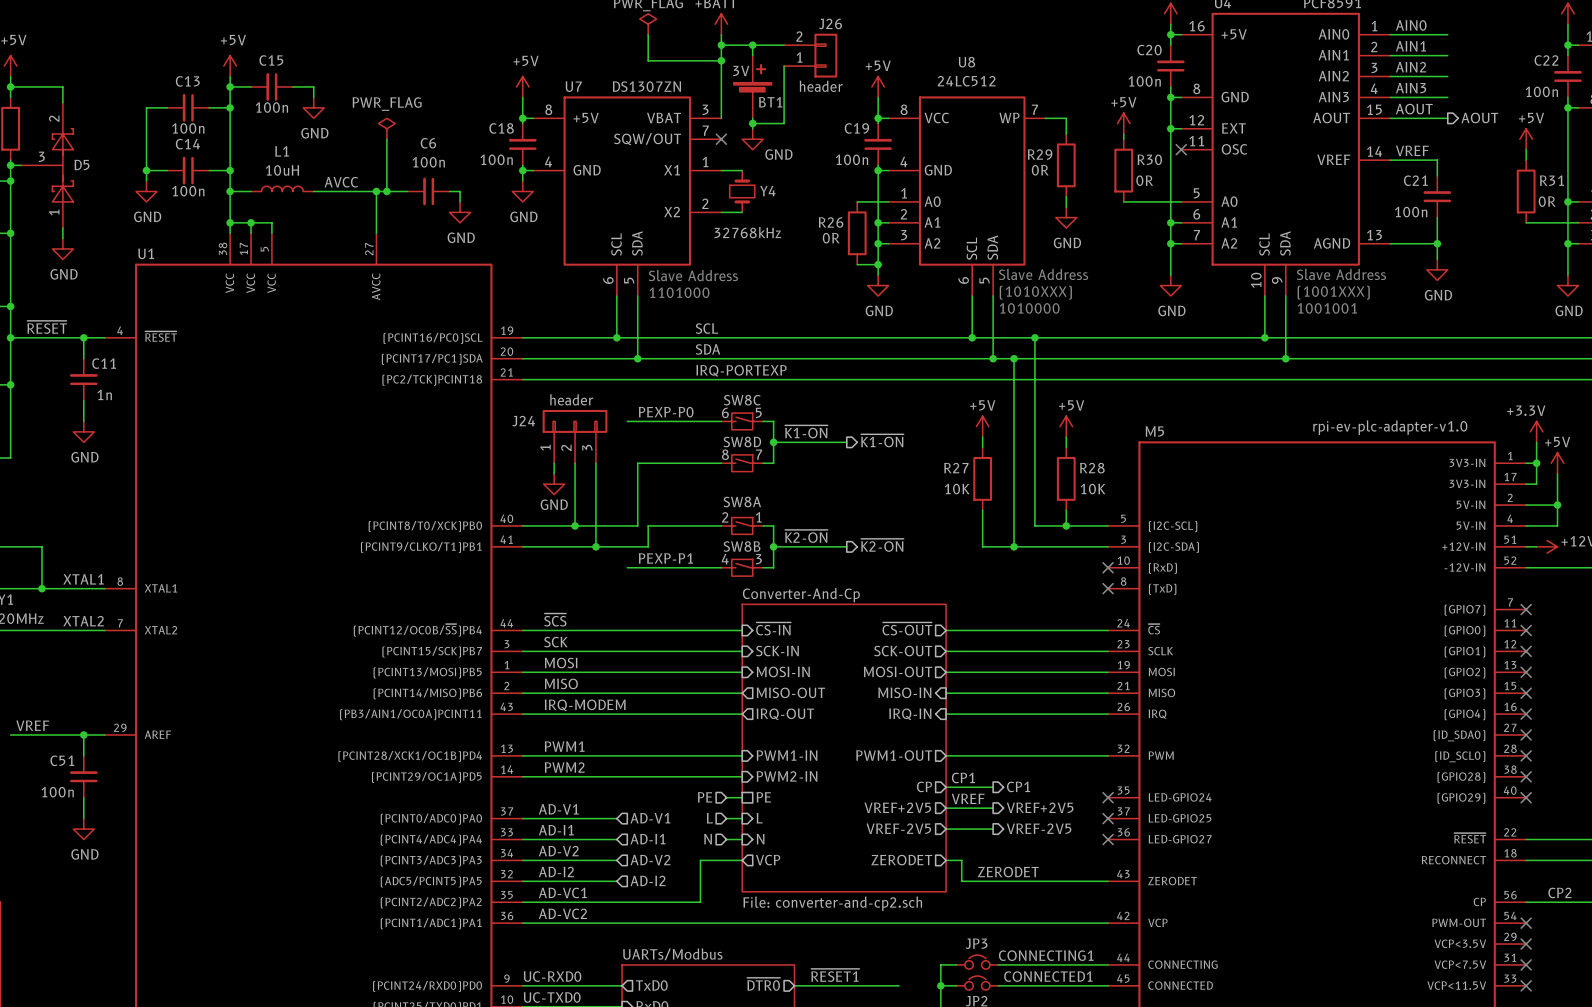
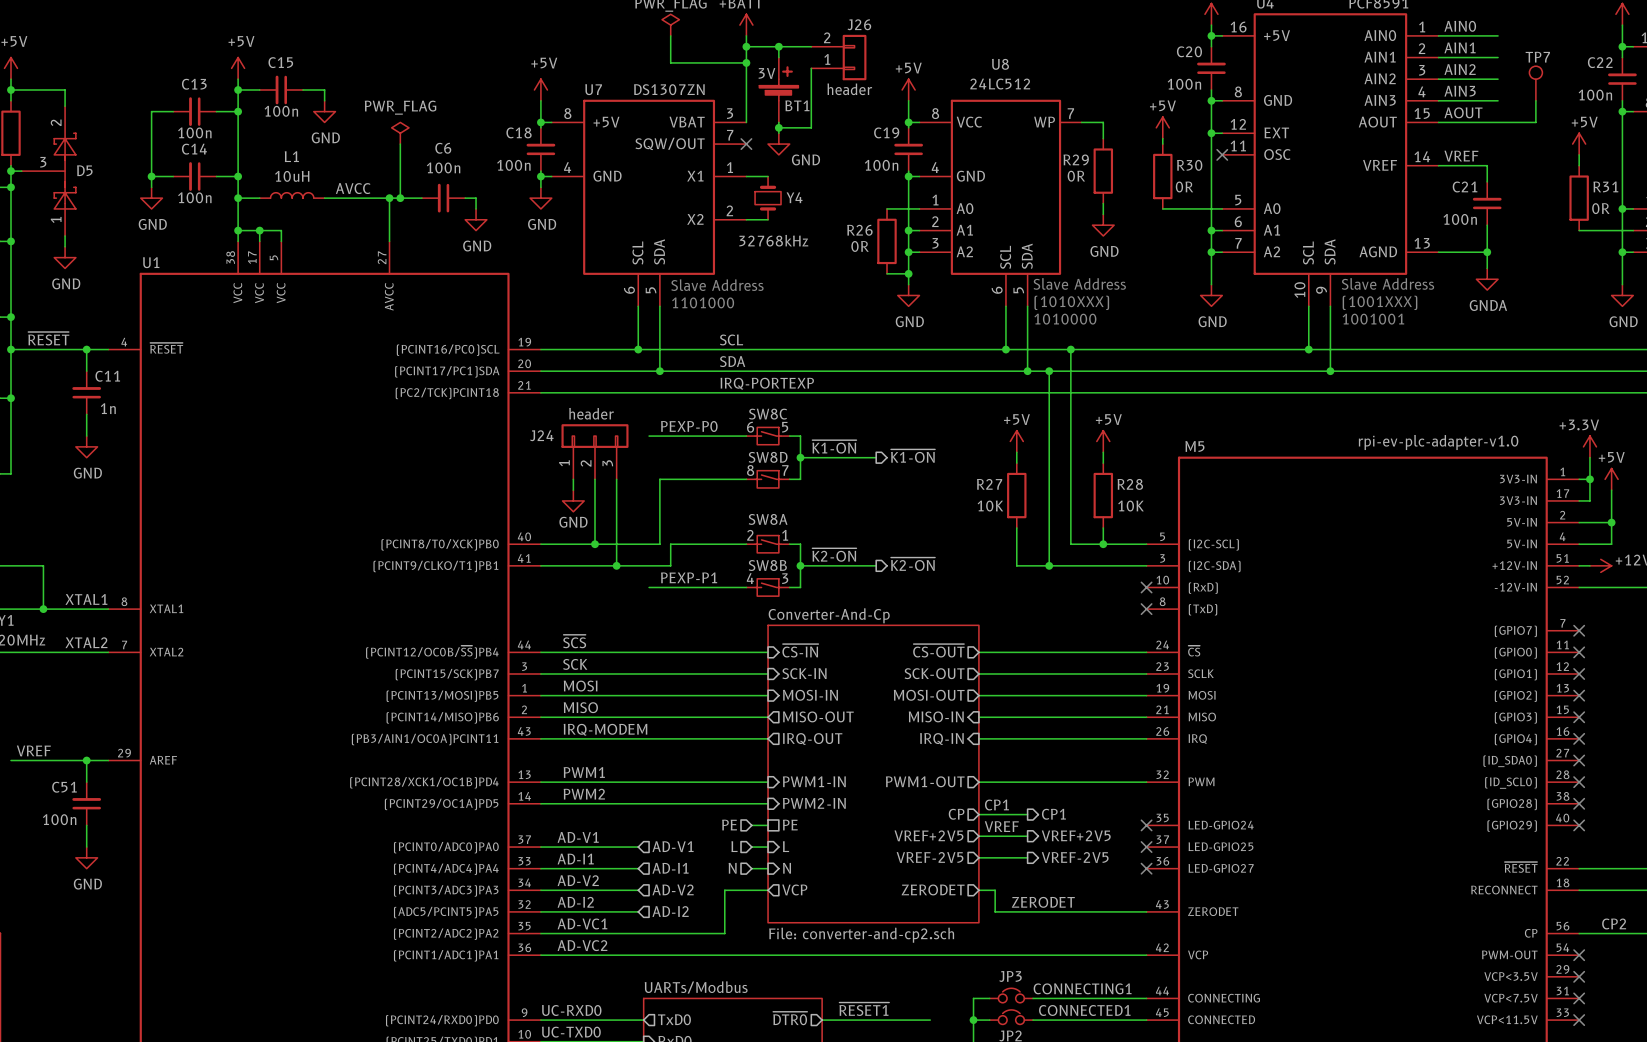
TP7: none -> (1535, 83)
wire: none -> (1535, 100) (1535, 122) (1498, 122)
hierarchical label: AOUT (1479, 117) -> none
power symbol: GND (1437, 269) -> GNDA (1487, 279)

